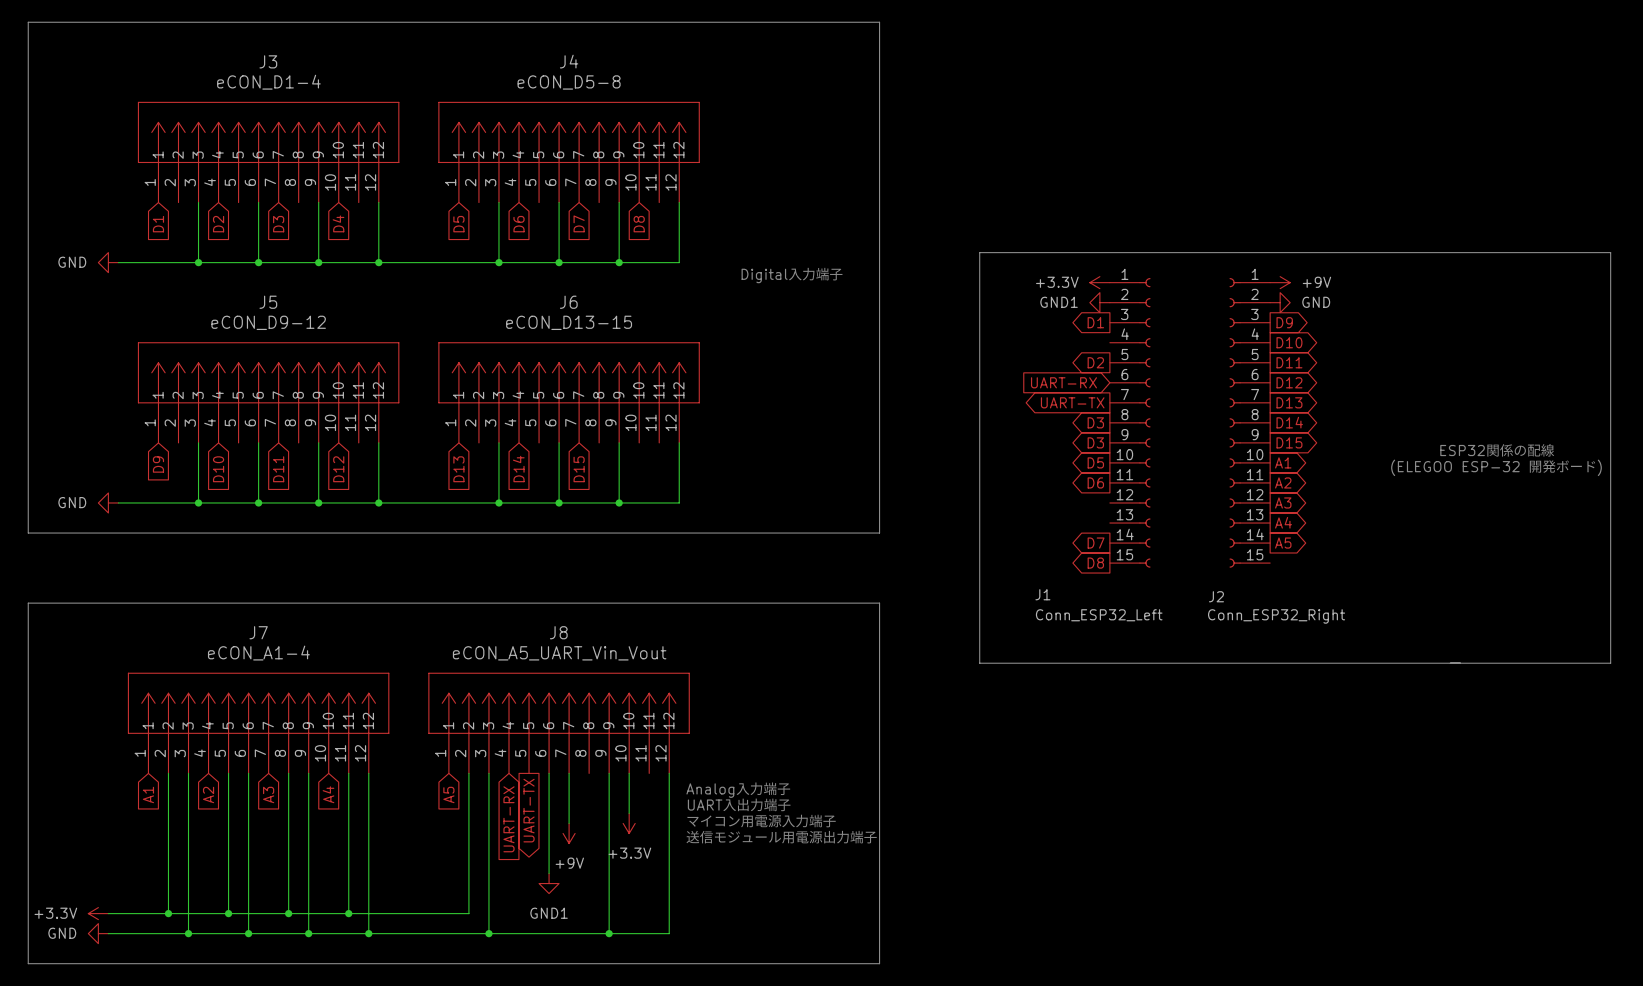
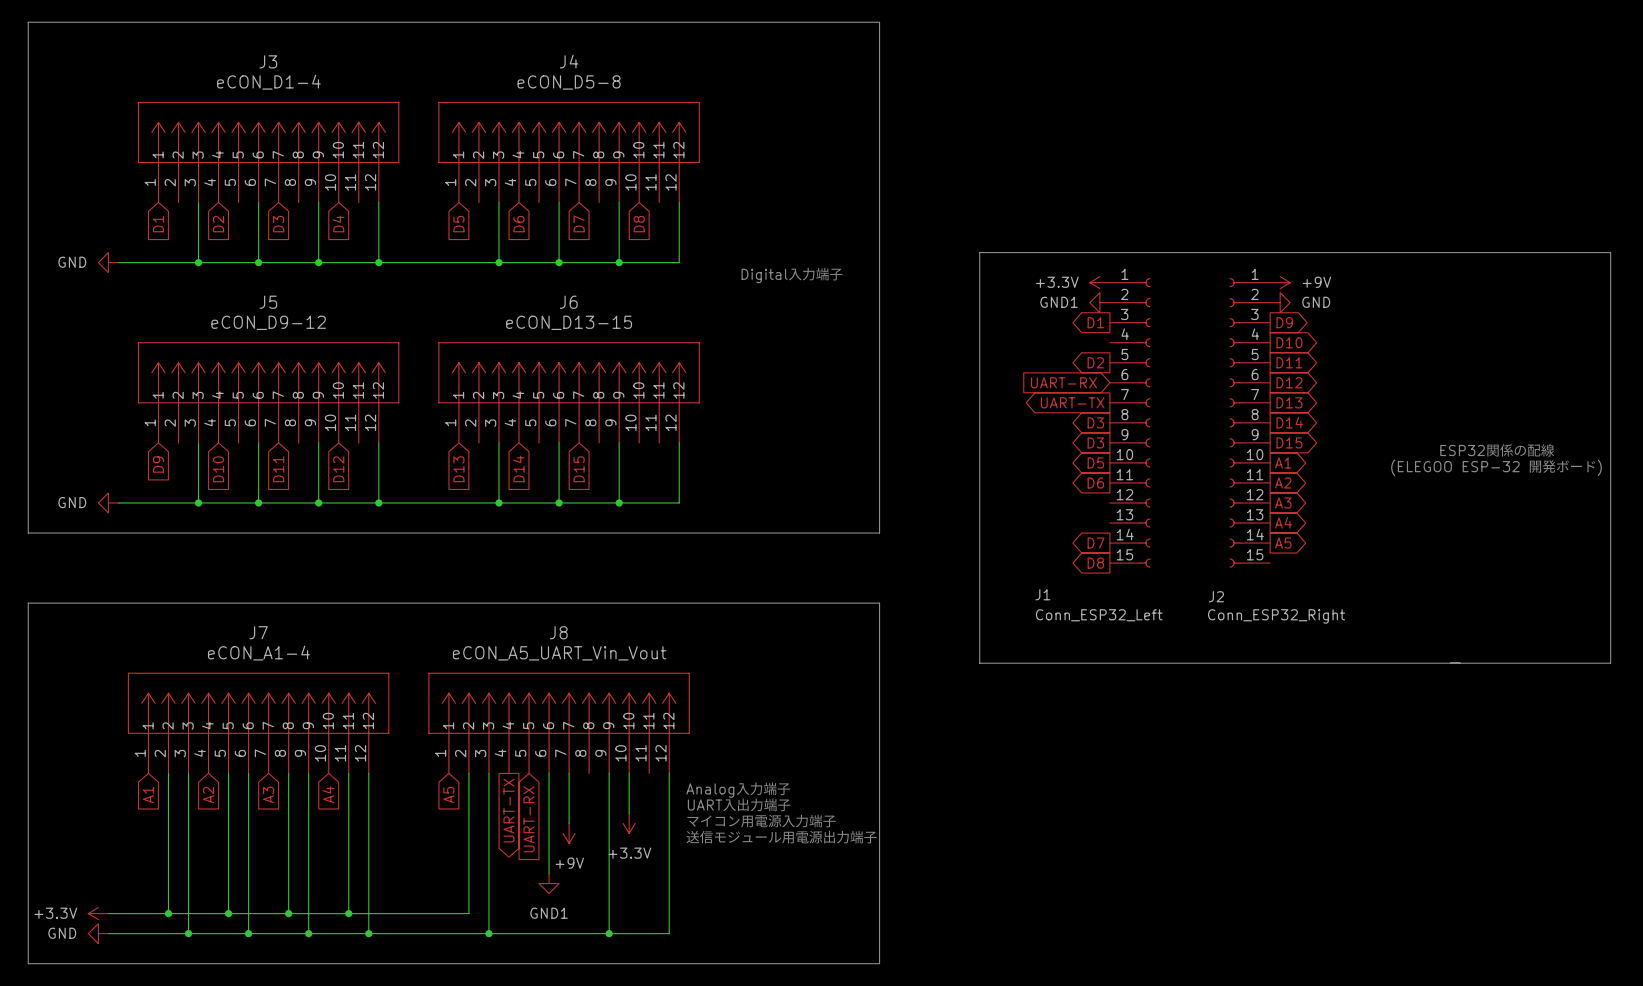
global label shape: output (529, 810) -> input (529, 819)
global label: UART-TX (529, 810) -> UART-RX (529, 819)
global label shape: input (508, 819) -> output (508, 810)
global label: UART-RX (508, 819) -> UART-TX (508, 810)

